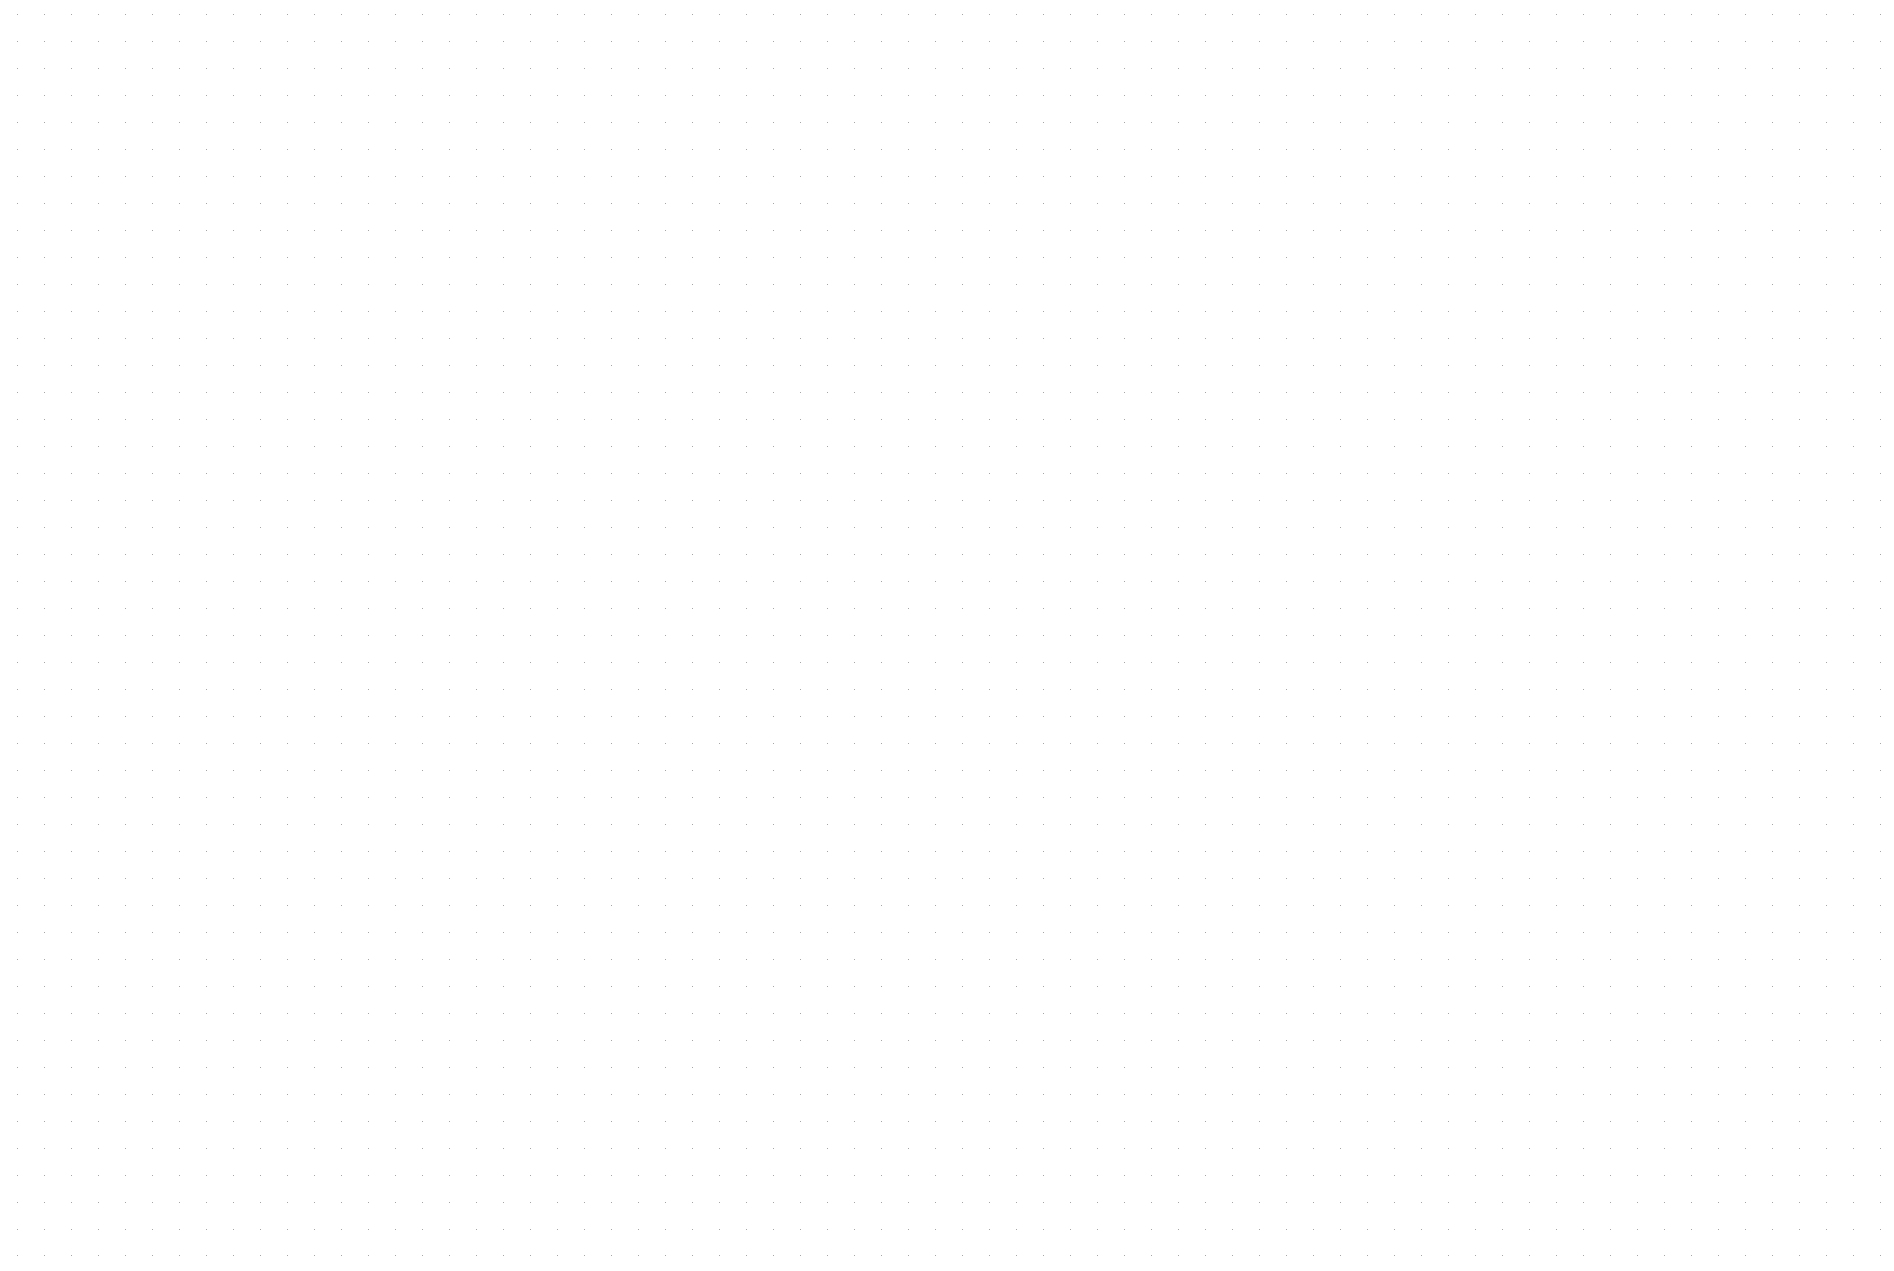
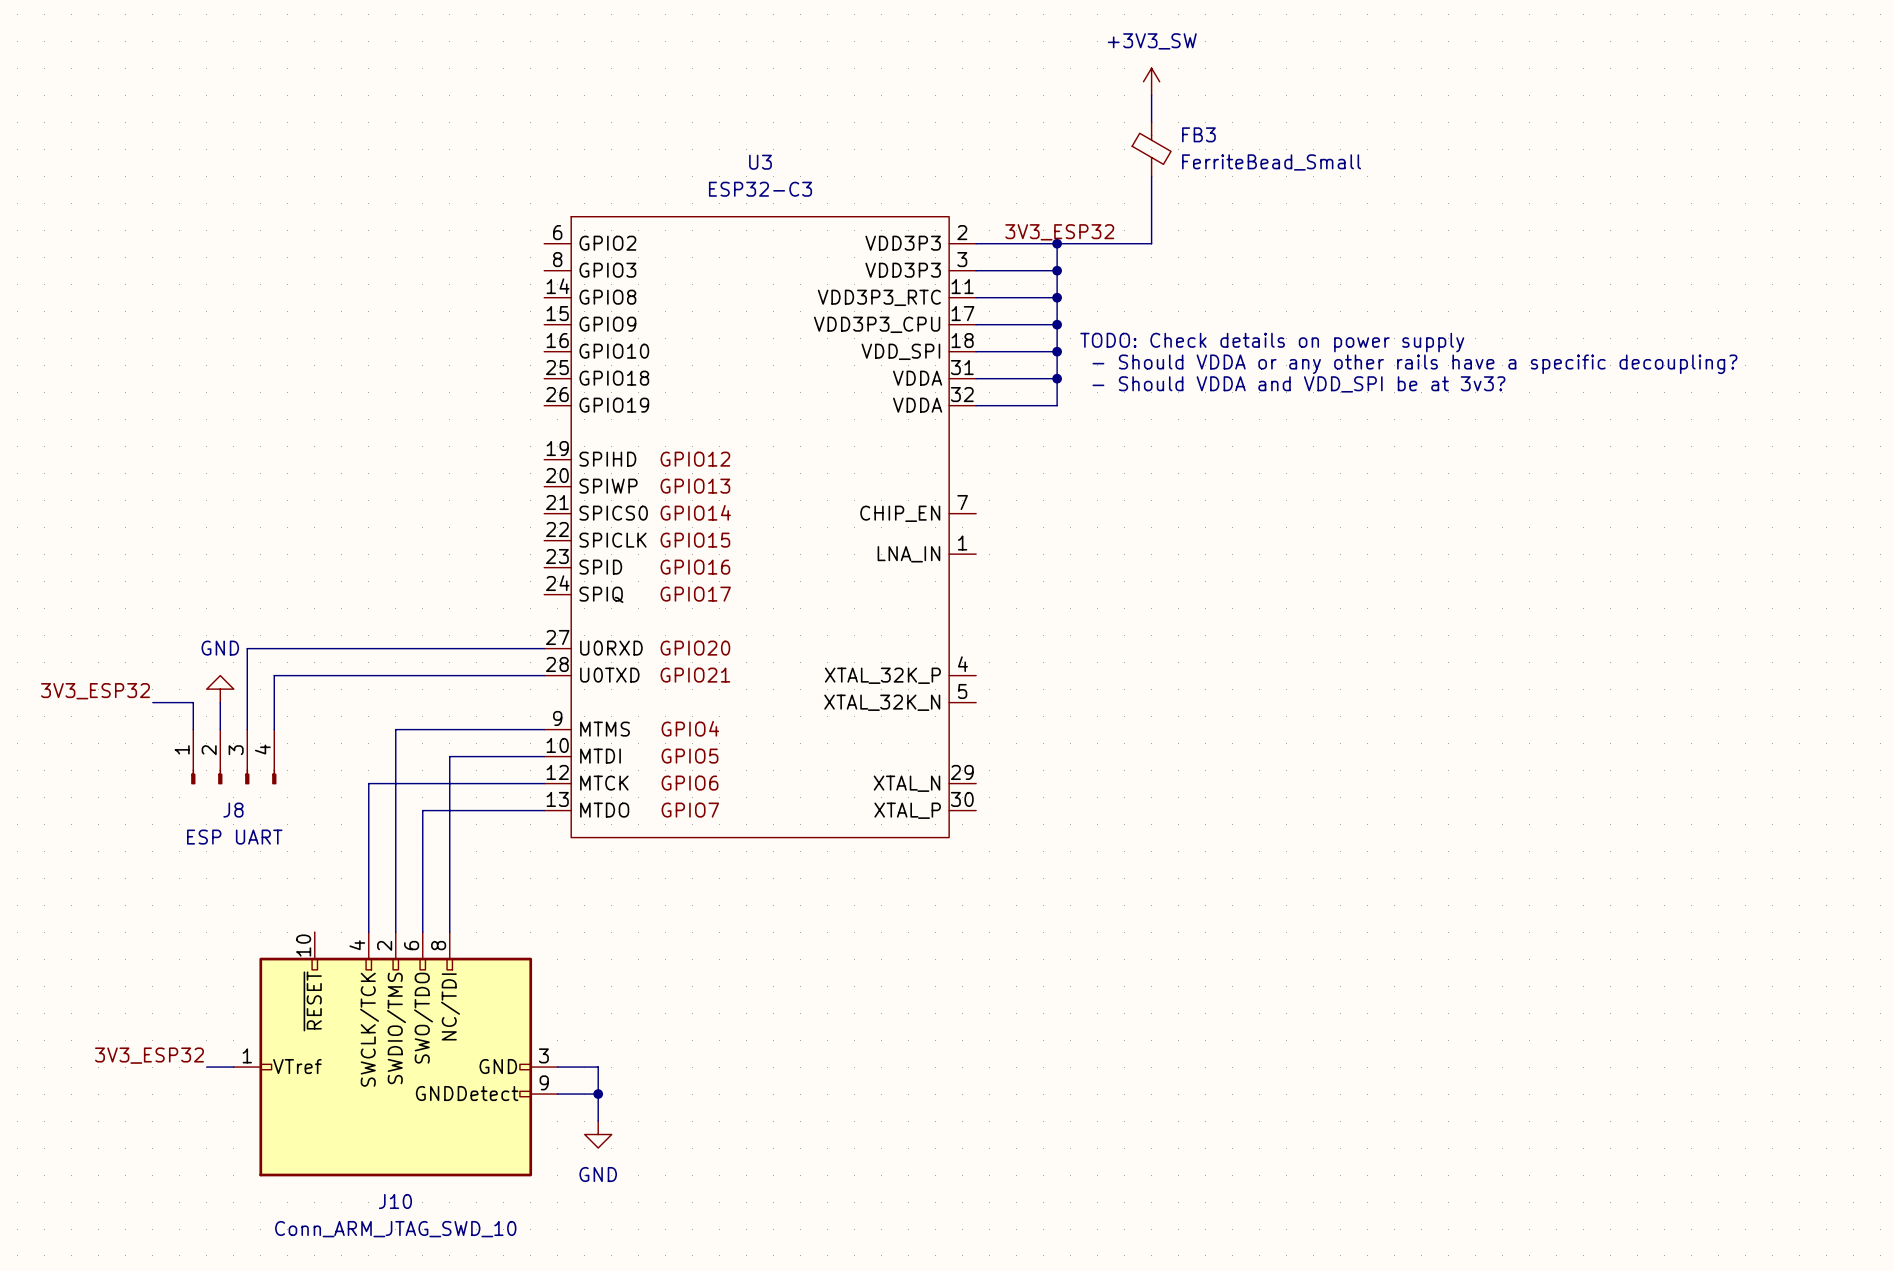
power symbol: none -> +3V3_SW (1151, 81)
wire: none -> (1151, 95) (1151, 122)
FB3: none -> FerriteBead_Small (1151, 149)
wire: none -> (1151, 176) (1151, 243) (976, 243)
label: none -> 3V3_ESP32 (1059, 232)
wire: none -> (1057, 243) (1057, 405) (976, 405)
junction: none -> (1057, 243)
wire: none -> (976, 270) (1057, 270)
junction: none -> (1057, 270)
wire: none -> (976, 297) (1057, 297)
junction: none -> (1057, 297)
wire: none -> (976, 324) (1057, 324)
junction: none -> (1057, 324)
text: none -> TODO: Check details on power supply (1272, 342)
wire: none -> (976, 351) (1057, 351)
junction: none -> (1057, 351)
text: none -> - Should VDDA or any other rails have a specific decoupling? (1414, 364)
wire: none -> (976, 378) (1057, 378)
junction: none -> (1057, 378)
text: none -> - Should VDDA and VDD_SPI be at 3v3? (1298, 384)
U3: none -> ESP32-C3 (760, 527)
wire: none -> (544, 648) (247, 648) (247, 729)
wire: none -> (544, 675) (274, 675) (274, 729)
power symbol: none -> GND (220, 689)
label: none -> 3V3_ESP32 (95, 691)
wire: none -> (152, 702) (193, 702) (193, 729)
wire: none -> (220, 702) (220, 729)
wire: none -> (544, 729) (395, 729) (395, 932)
wire: none -> (544, 756) (449, 756) (449, 932)
J8: none -> ESP UART (233, 757)
wire: none -> (544, 783) (368, 783) (368, 932)
wire: none -> (544, 810) (422, 810) (422, 932)
J10: none -> Conn_ARM_JTAG_SWD_10 (395, 1054)
label: none -> 3V3_ESP32 (149, 1055)
wire: none -> (206, 1067) (233, 1067)
wire: none -> (557, 1067) (598, 1067) (598, 1121)
wire: none -> (557, 1094) (598, 1094)
junction: none -> (598, 1094)
power symbol: none -> GND (598, 1134)

